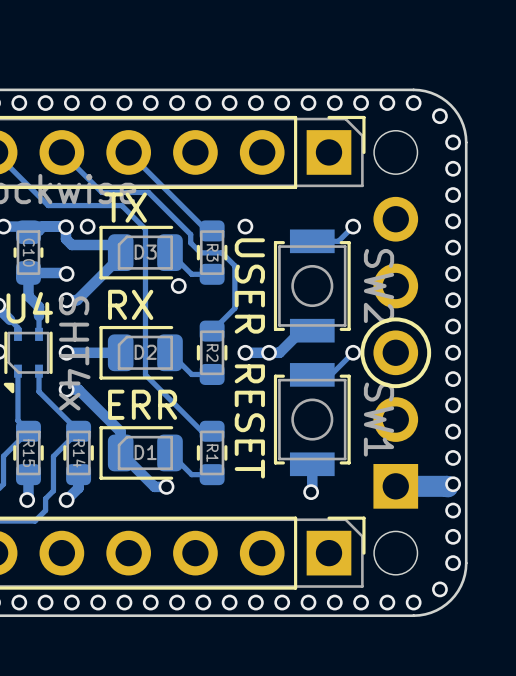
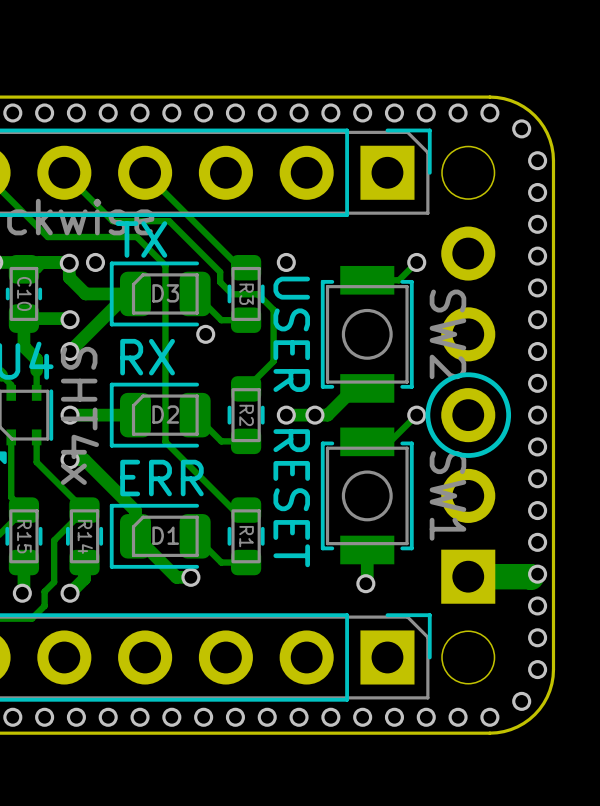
track: (71, 244) (113, 244) (120, 252) (120, 256) (77, 300) (66, 300) -> (127, 293) (70, 351)
track: none -> (76, 284) (85, 293) (135, 293)

